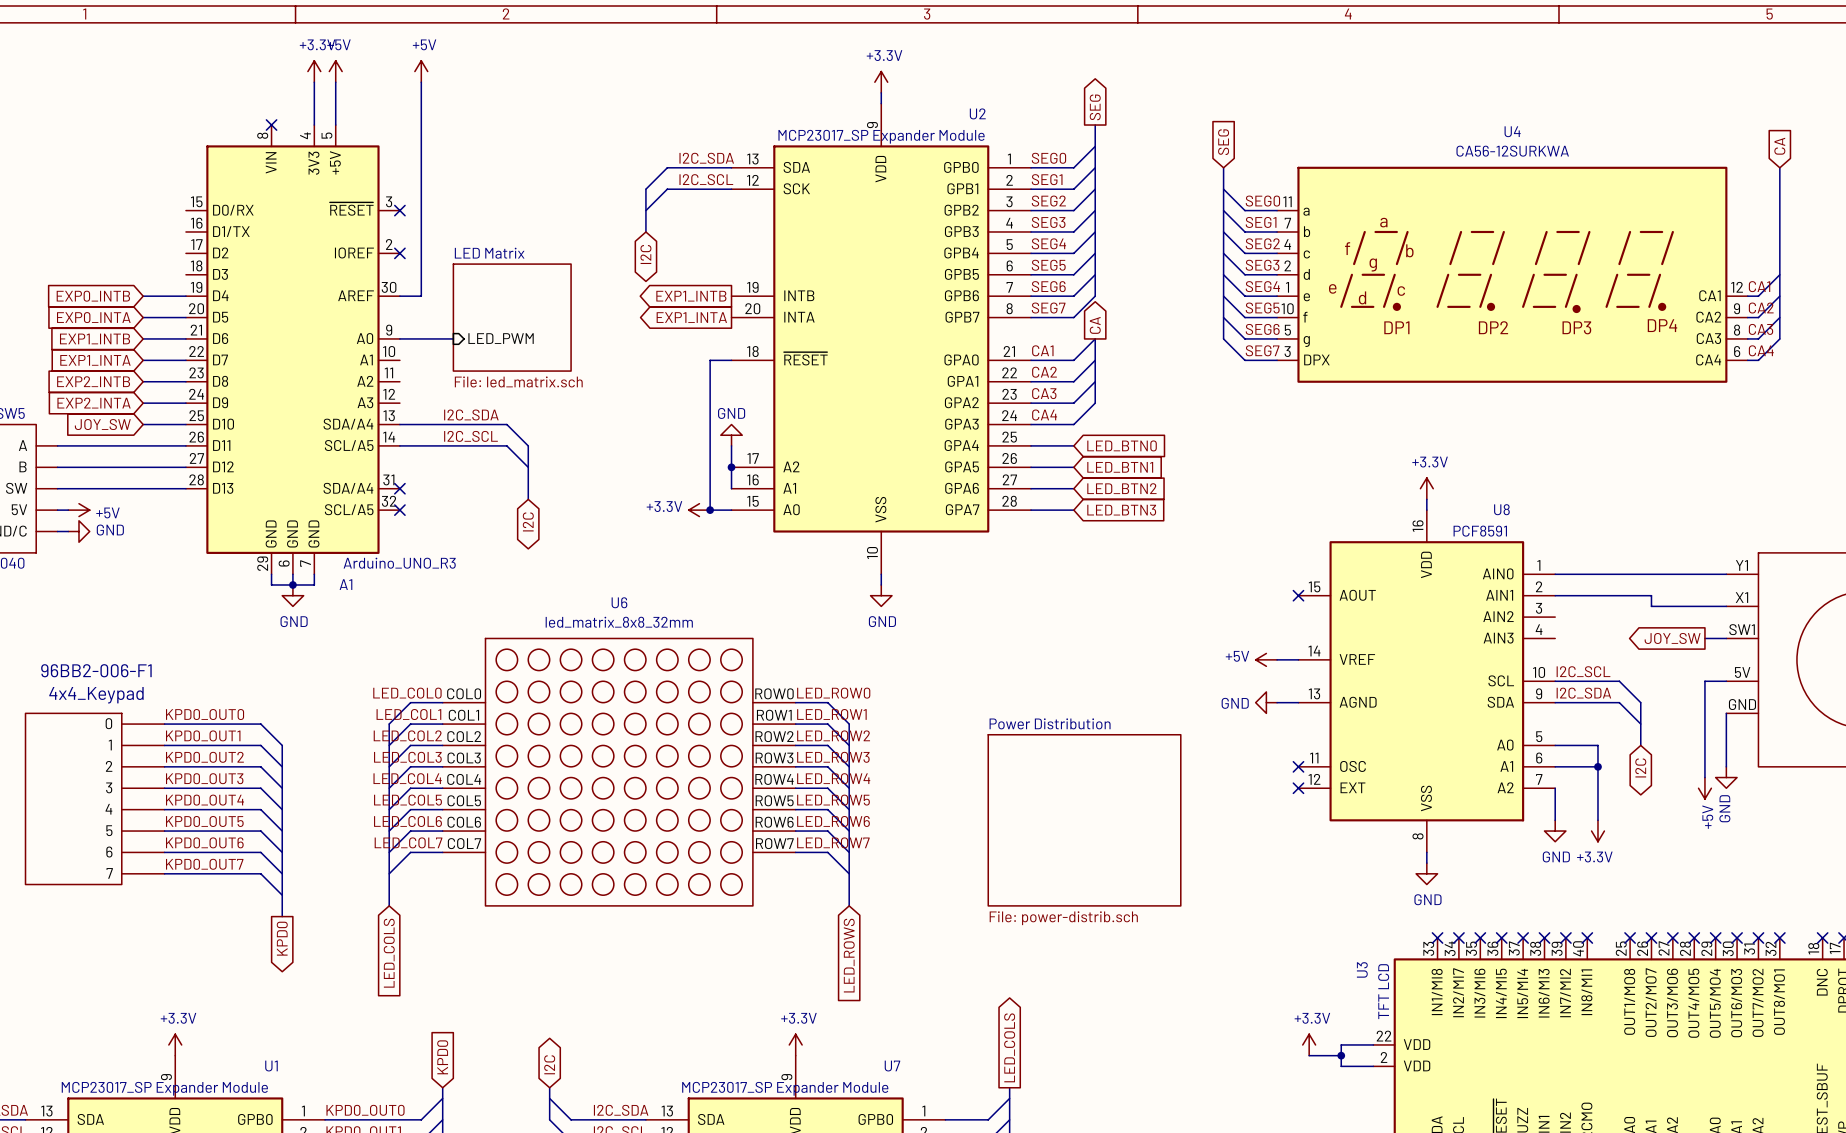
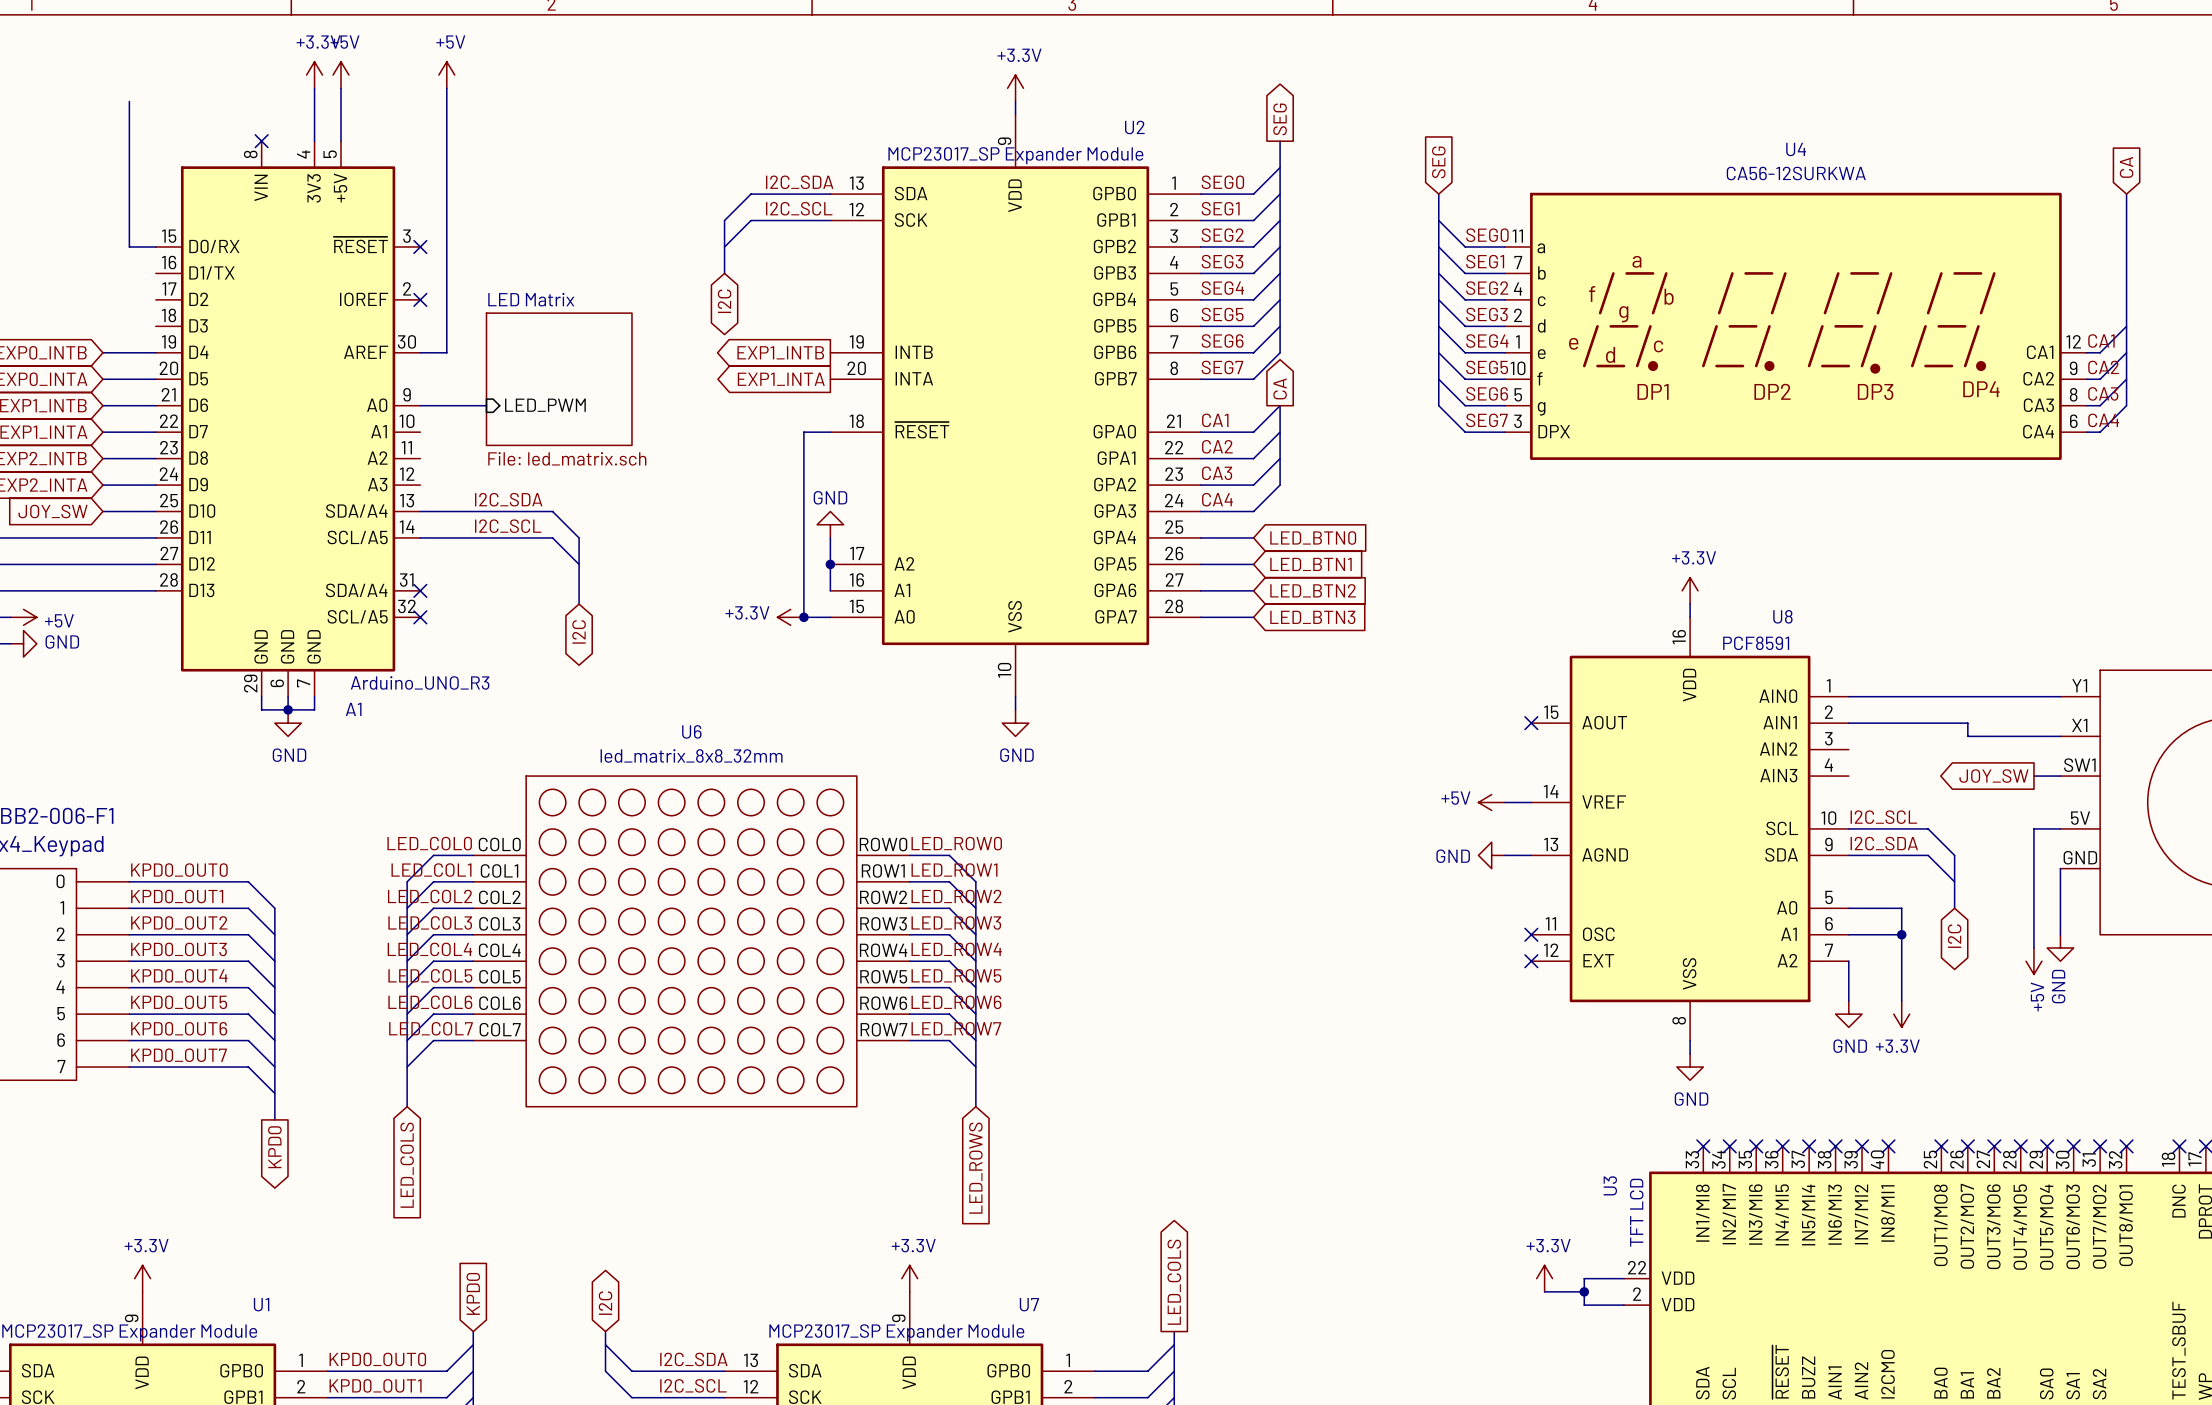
wire: none -> (129, 101) (129, 246) (155, 246)
sheet Power Distribution: File: power-distrib.sch (1084, 820) -> none

